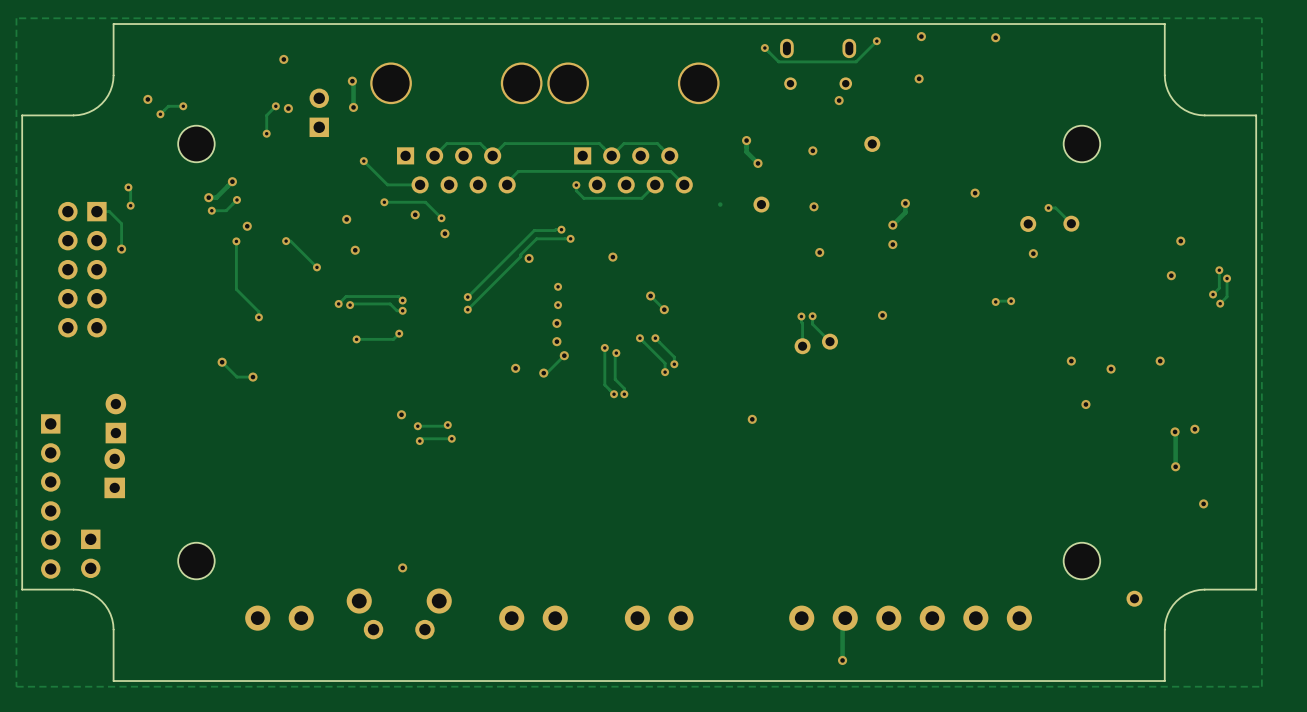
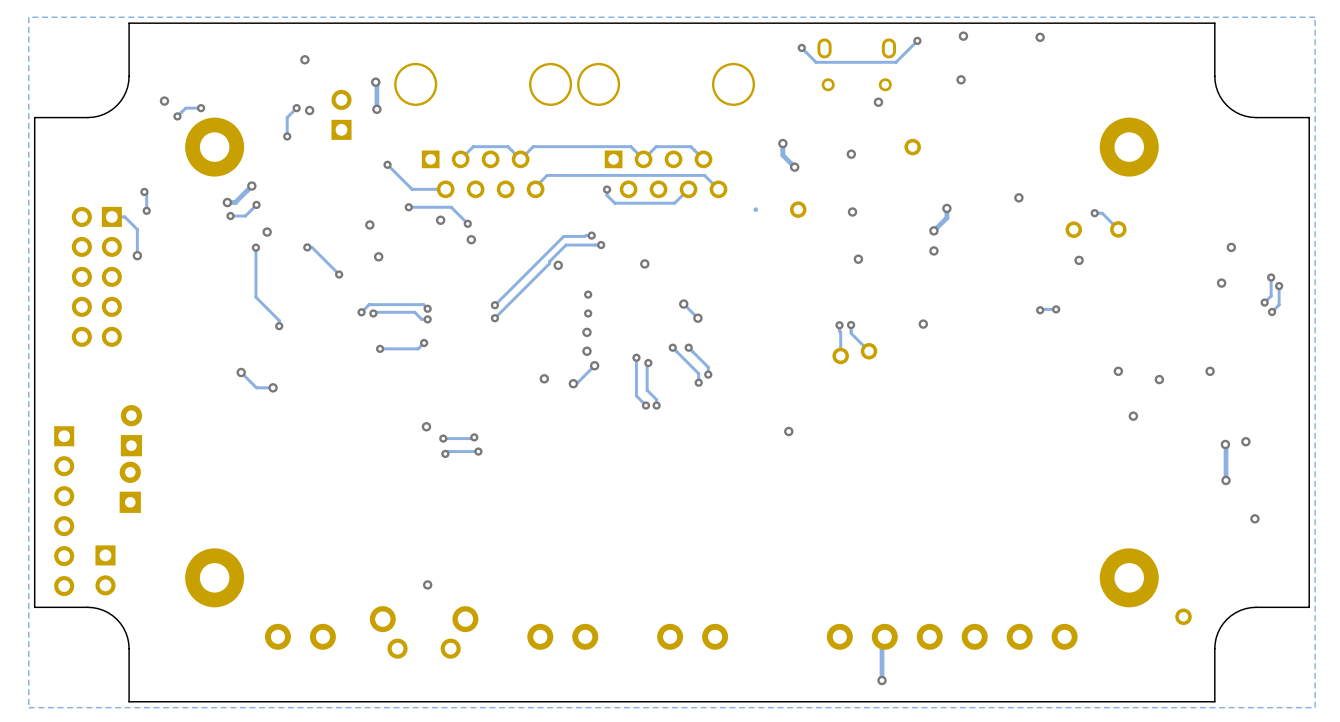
part footprint: [178, 125, 215, 163] -> [185, 117, 245, 177]
part footprint: [1063, 125, 1101, 163] -> [1099, 117, 1159, 177]
part footprint: [178, 542, 215, 580] -> [185, 548, 245, 608]
part footprint: [1063, 542, 1101, 580] -> [1099, 548, 1159, 608]

